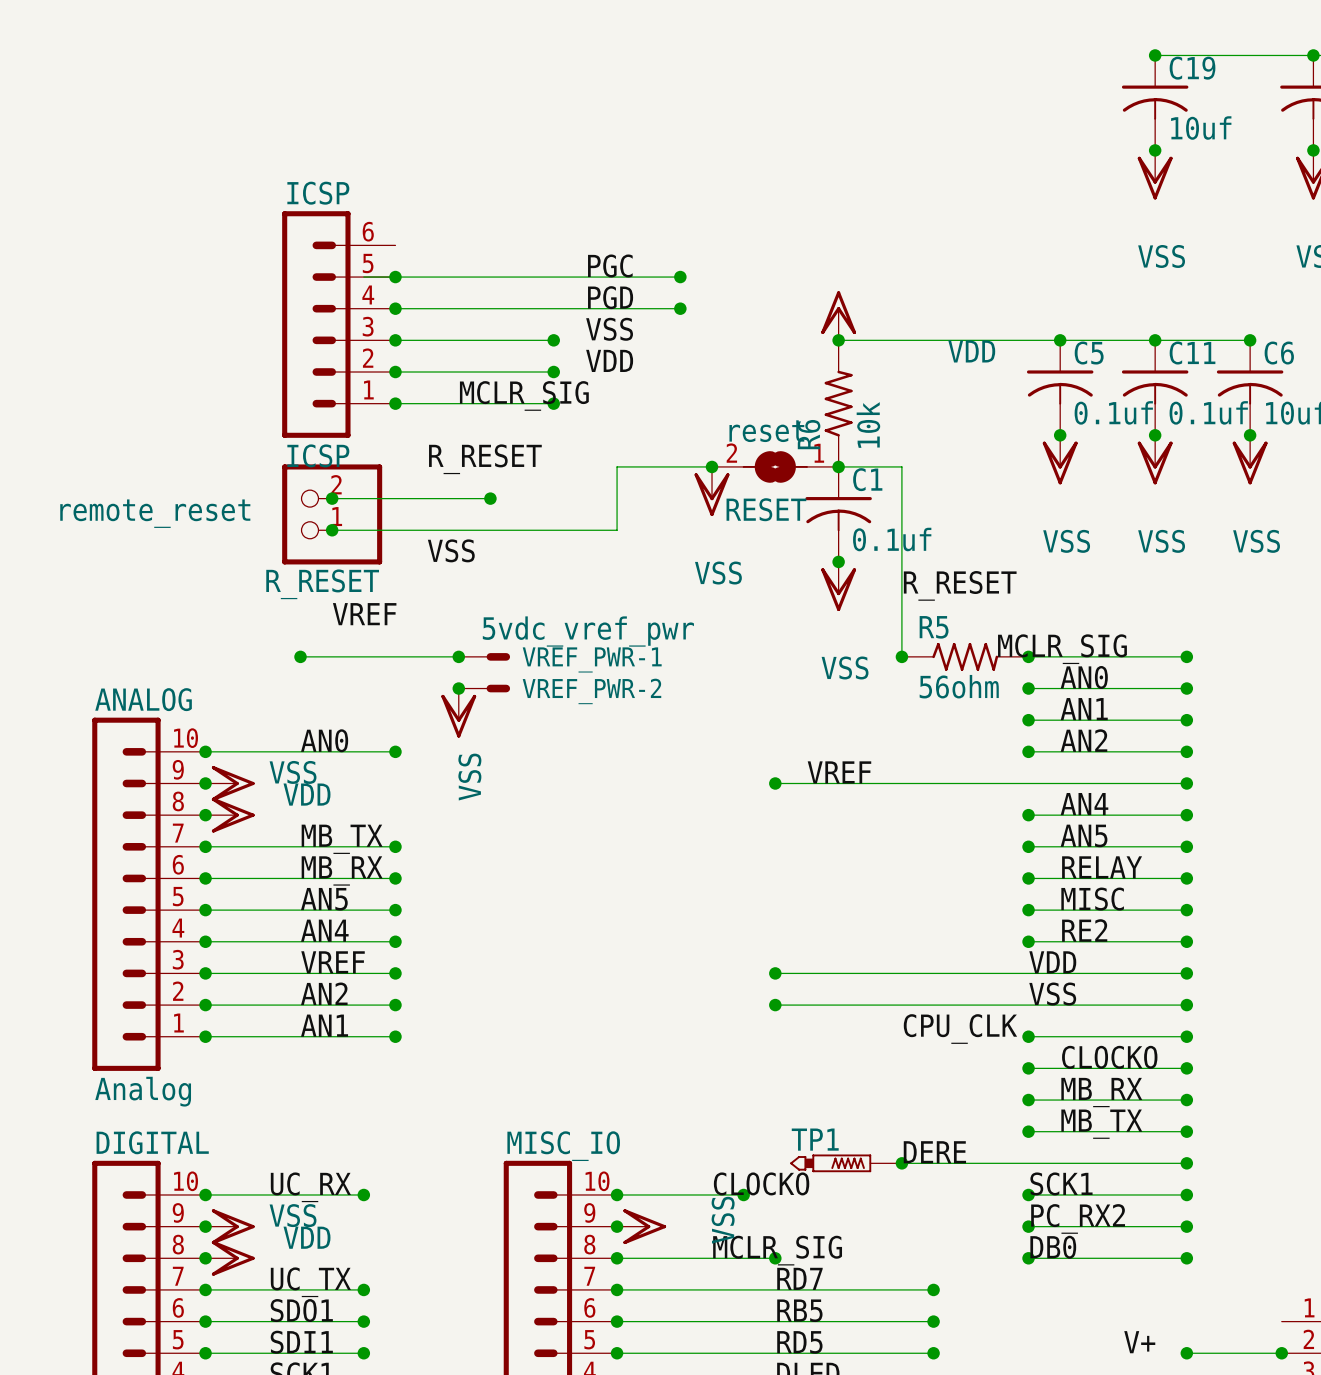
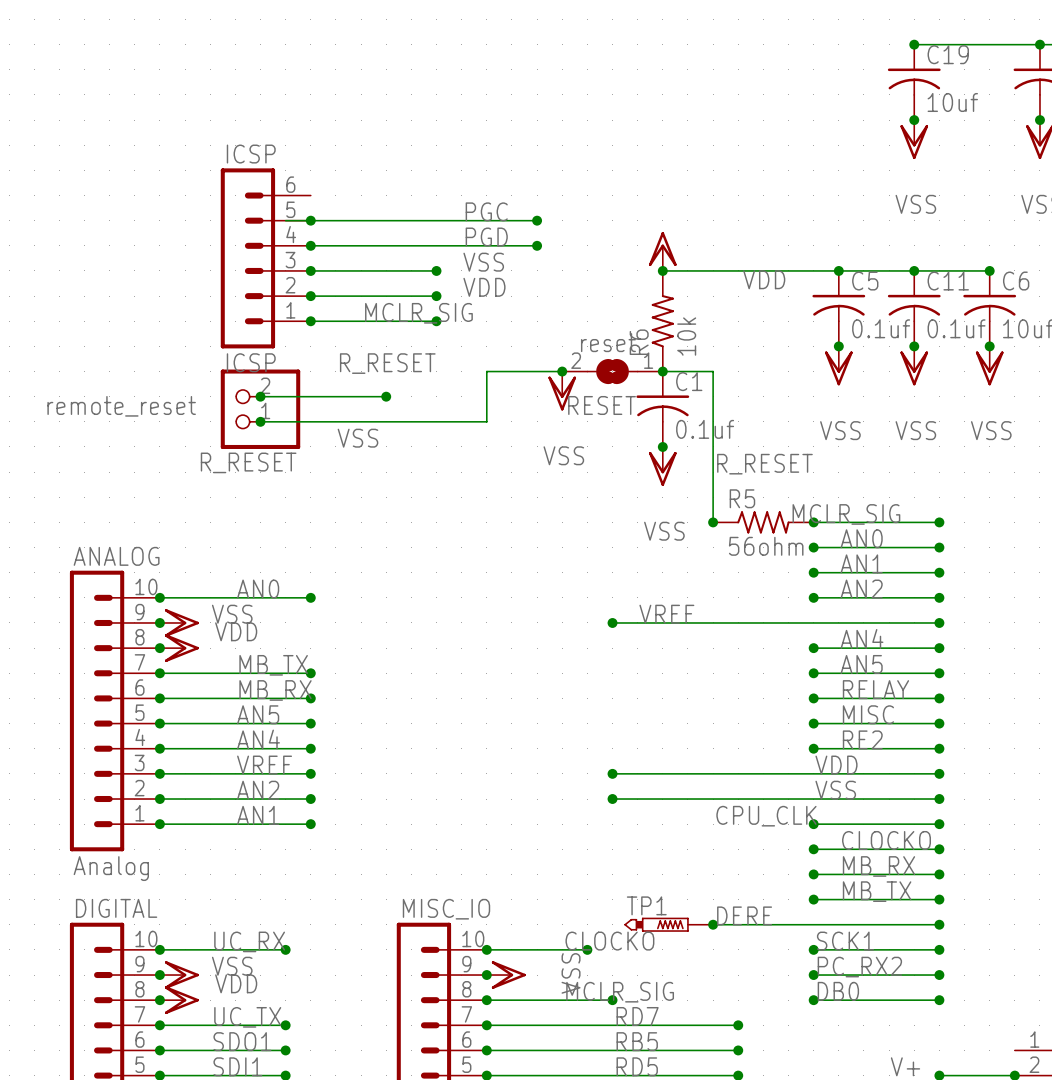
label: VREF (364, 614) -> none
wire: (300, 656) (458, 656) -> none
junction: (300, 656) -> none
junction: (458, 656) -> none
VREF_PWR-1: 5vdc_vref_pwr (484, 656) -> none
junction: (458, 688) -> none
VREF_PWR-2: (484, 688) -> none
power symbol: VSS (458, 713) -> none

